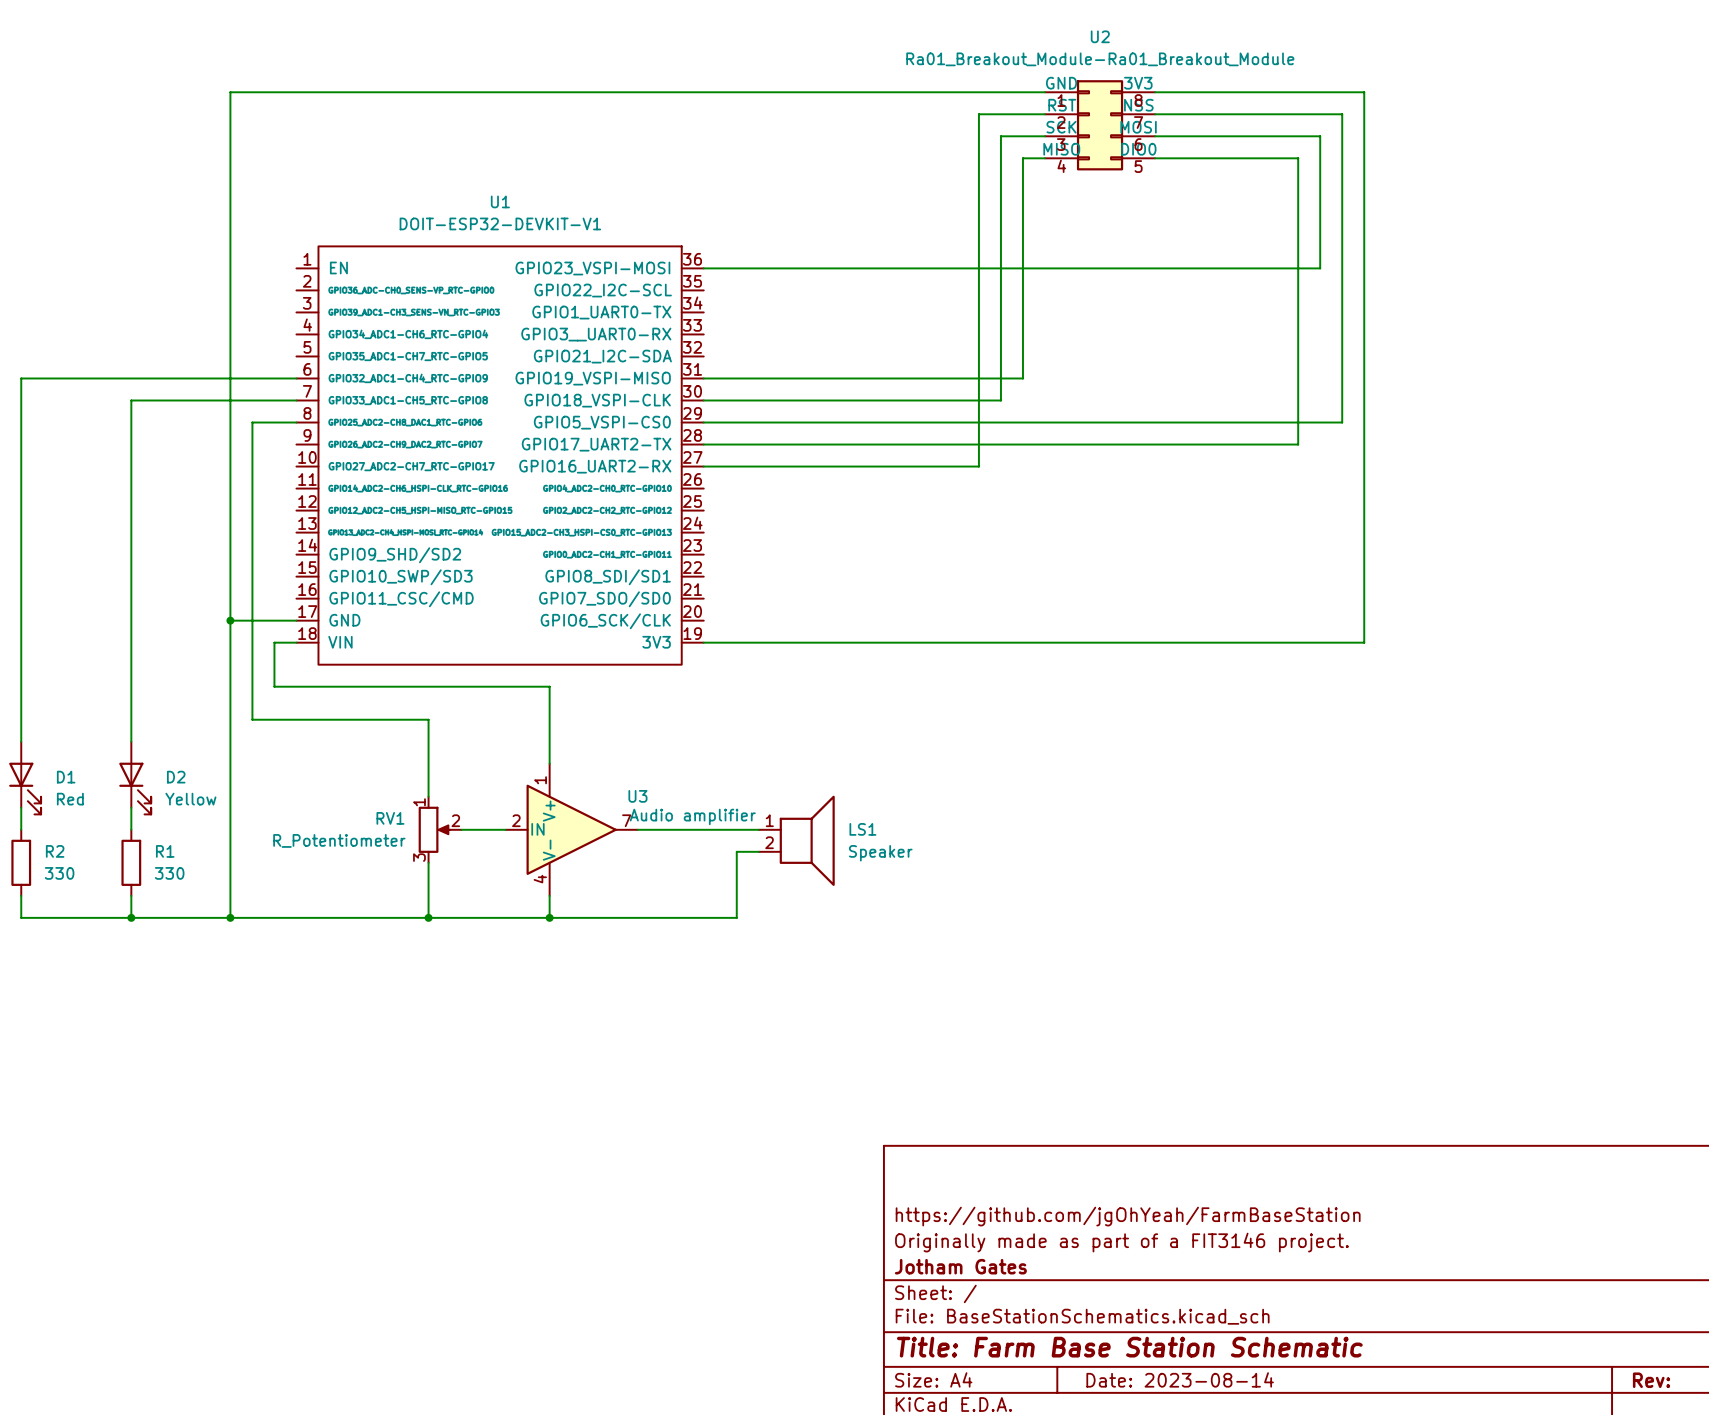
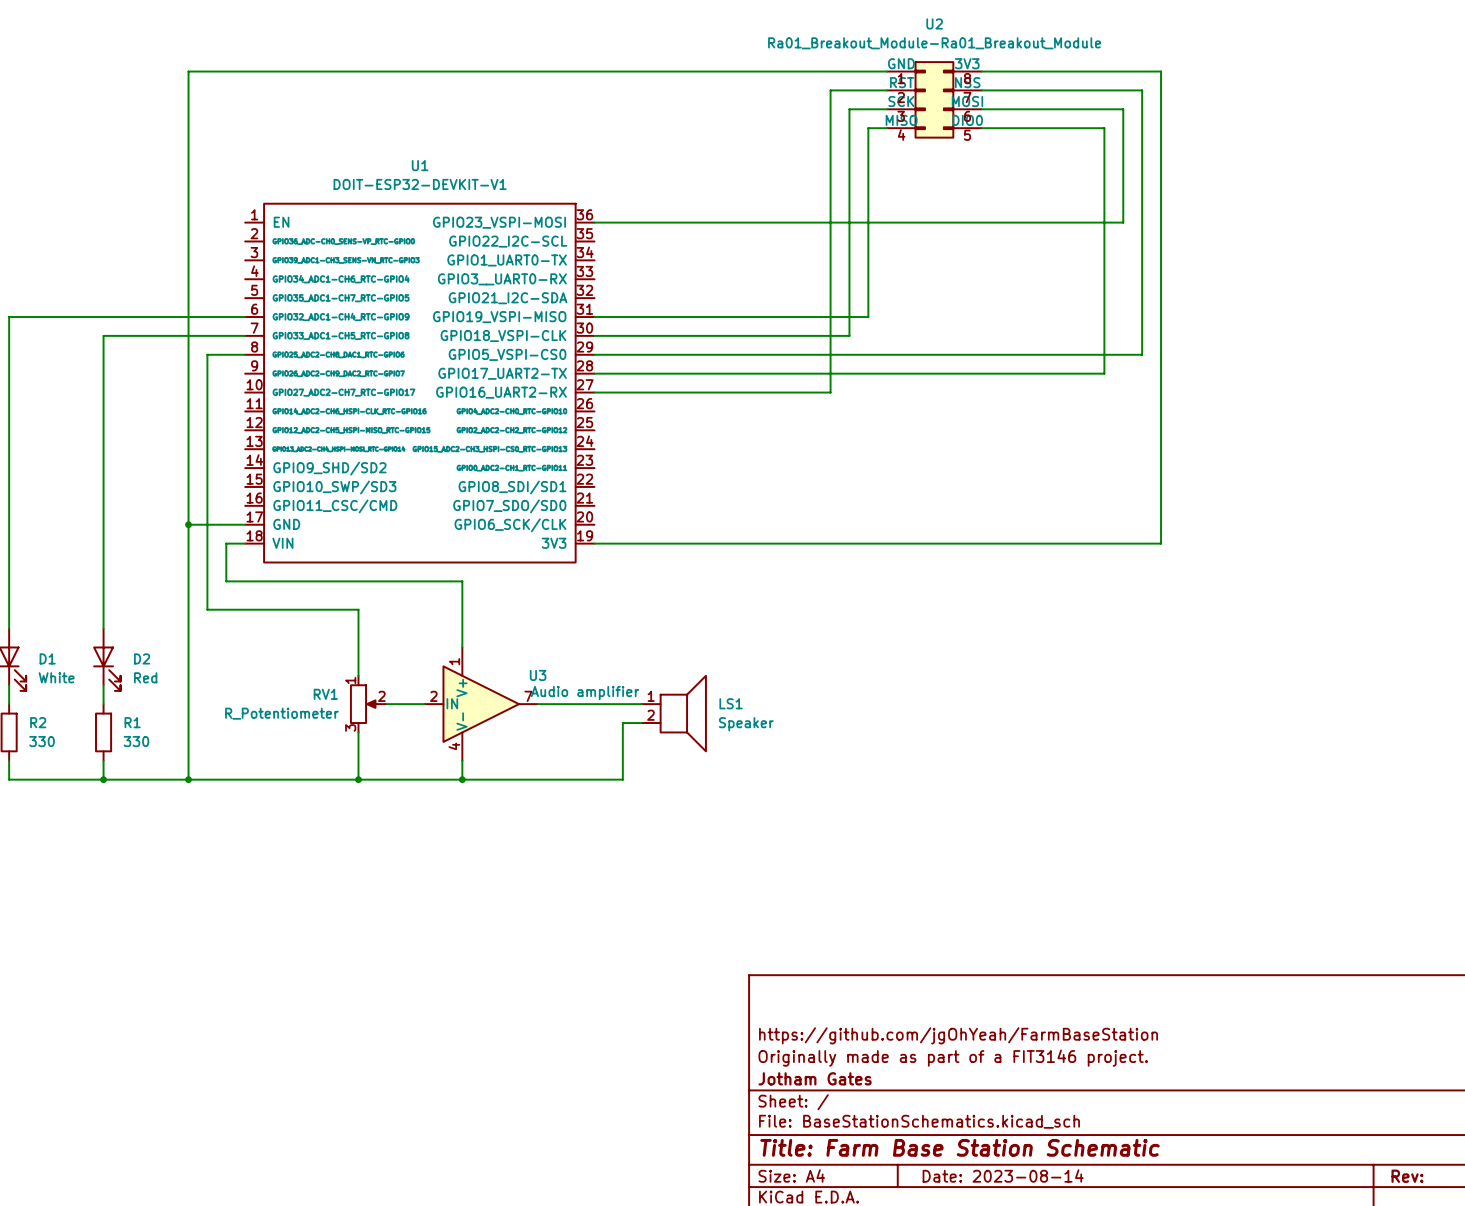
D1 value: Red (70, 799) -> White (56, 677)
D2 value: Yellow (190, 799) -> Red (145, 677)

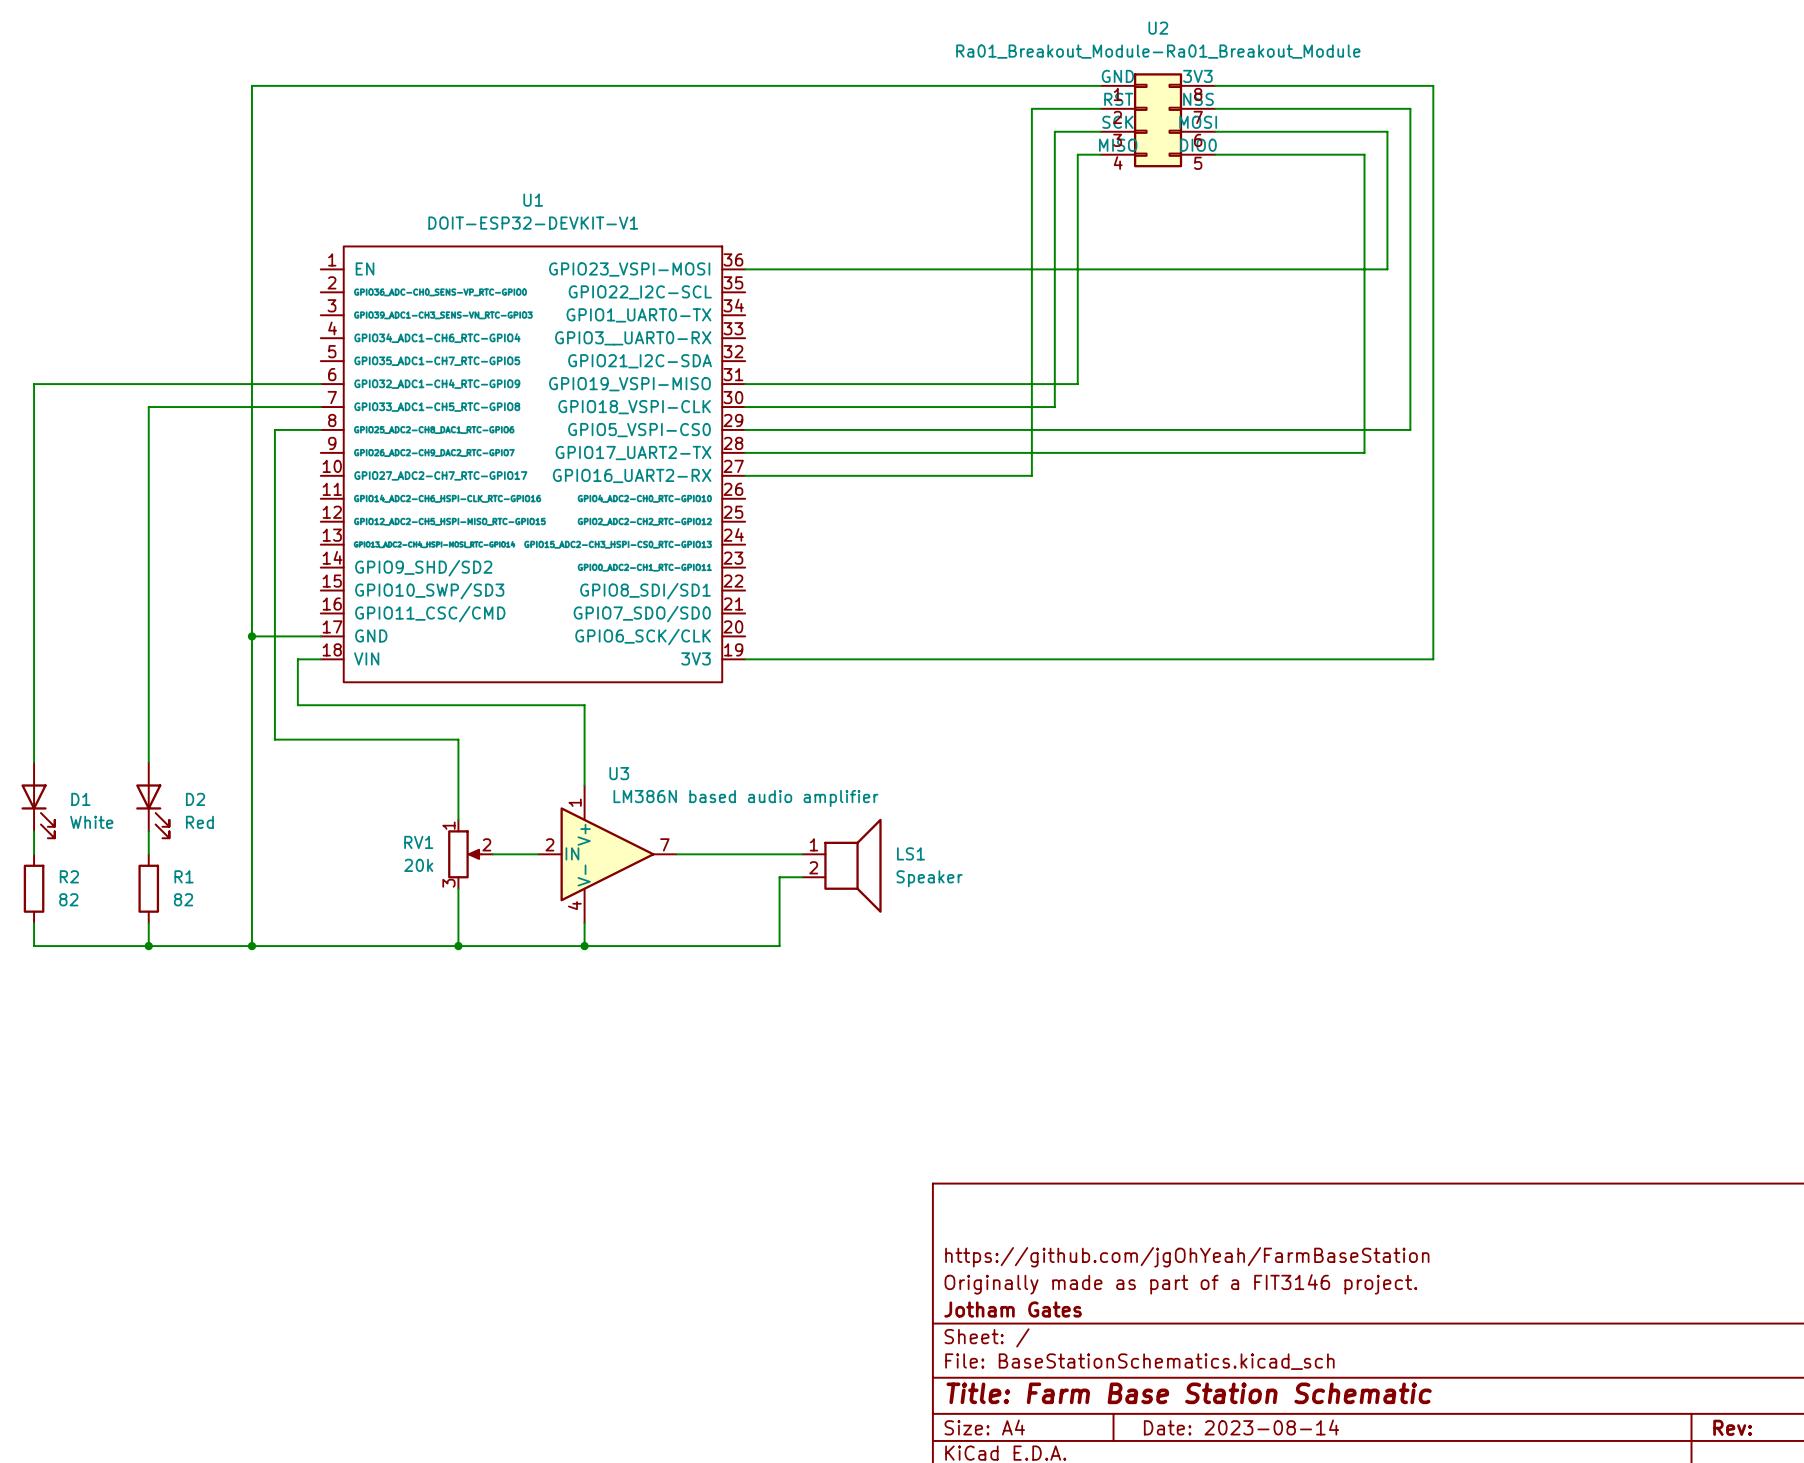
U3 name position: U3 (538, 675) -> U3 (619, 773)
U3 value: Audio amplifier (585, 693) -> LM386N based audio amplifier (745, 798)
RV1 value: R_Potentiometer (281, 713) -> 20k (418, 865)
R2 value: 330 (42, 741) -> 82 (68, 899)
R1 value: 330 (136, 741) -> 82 (183, 899)

